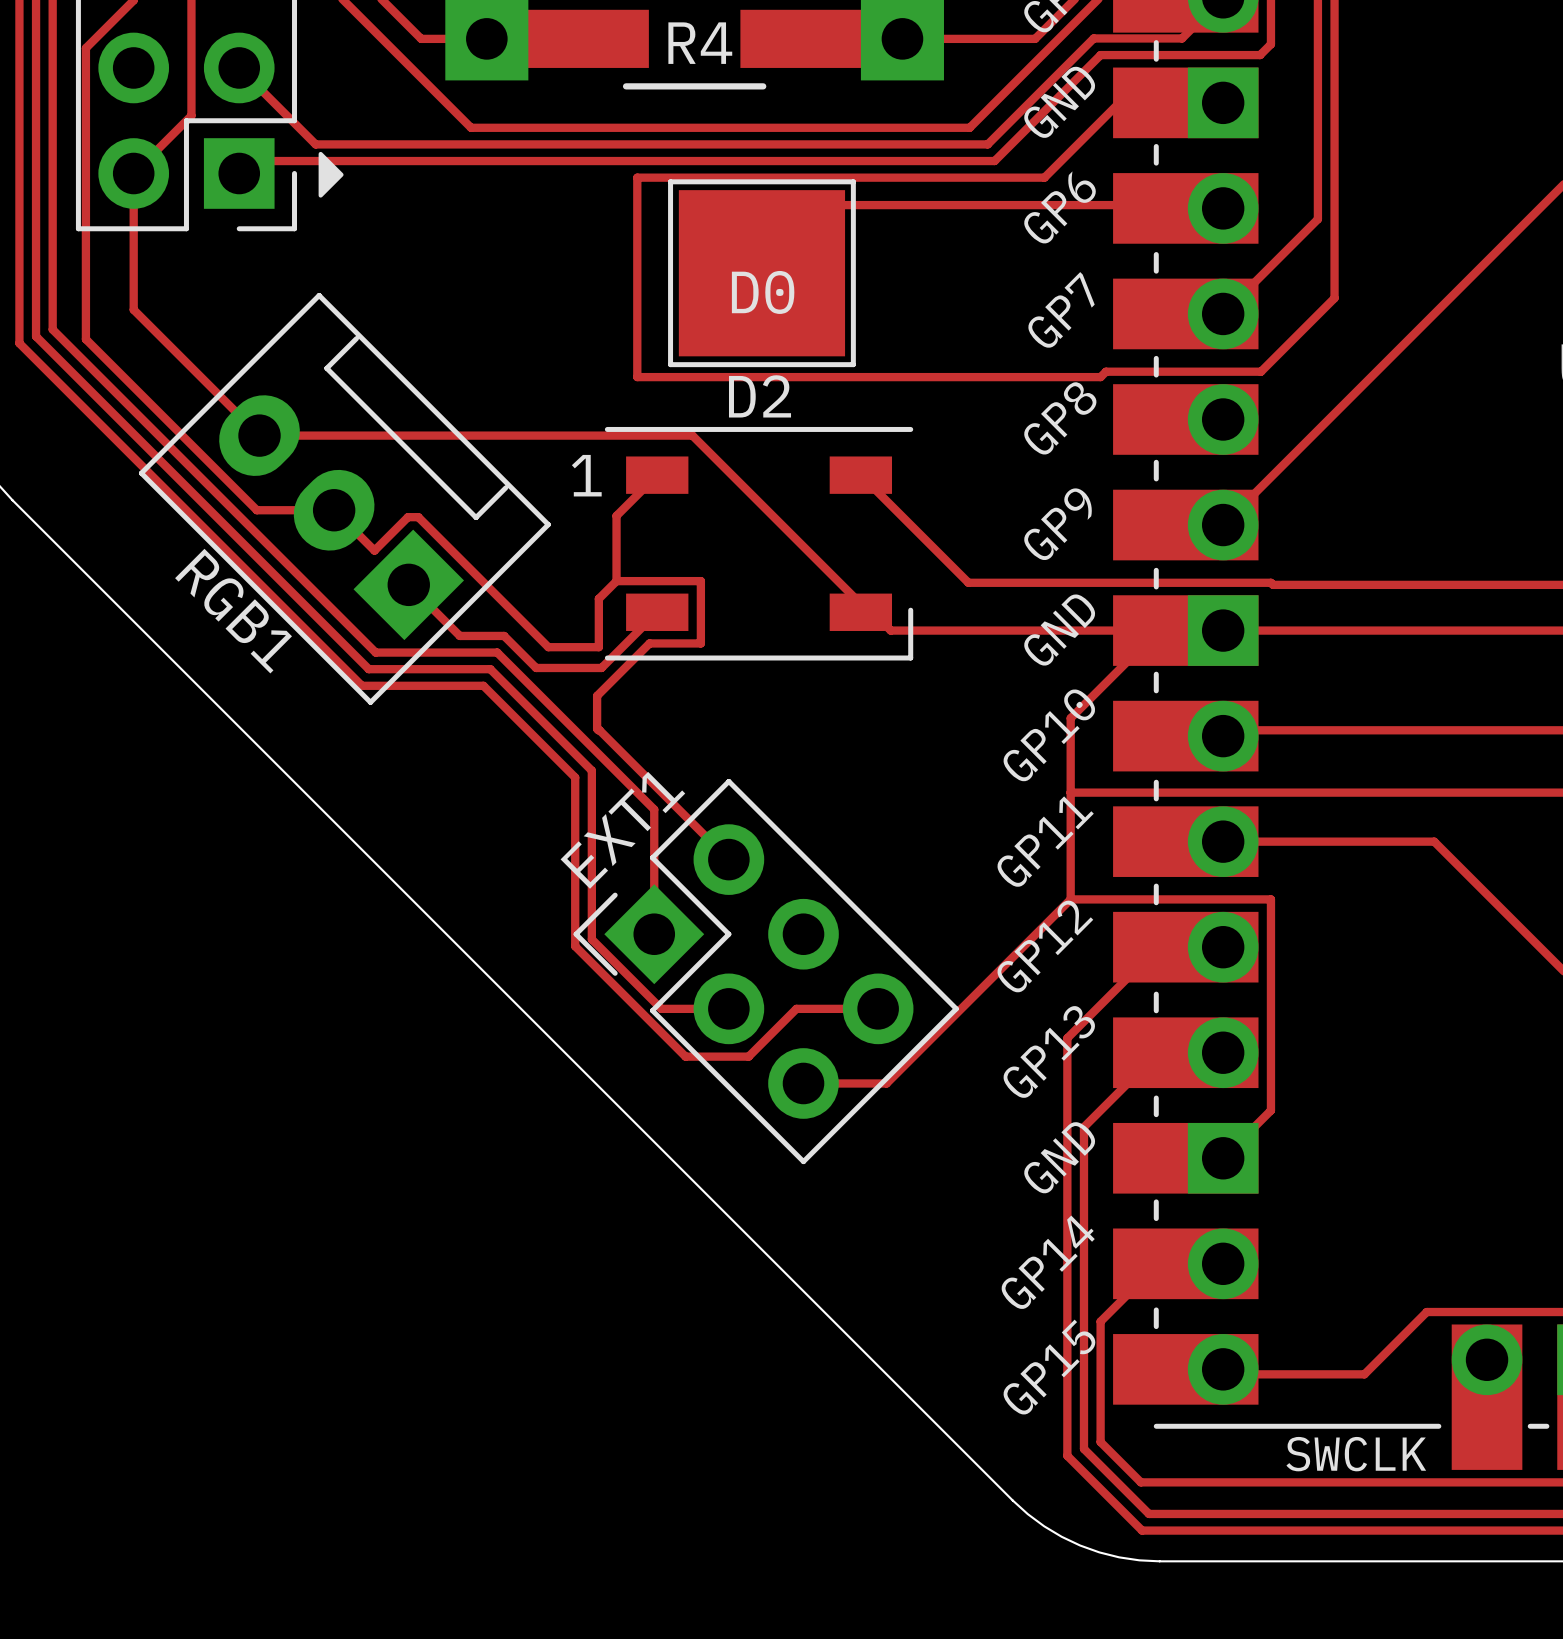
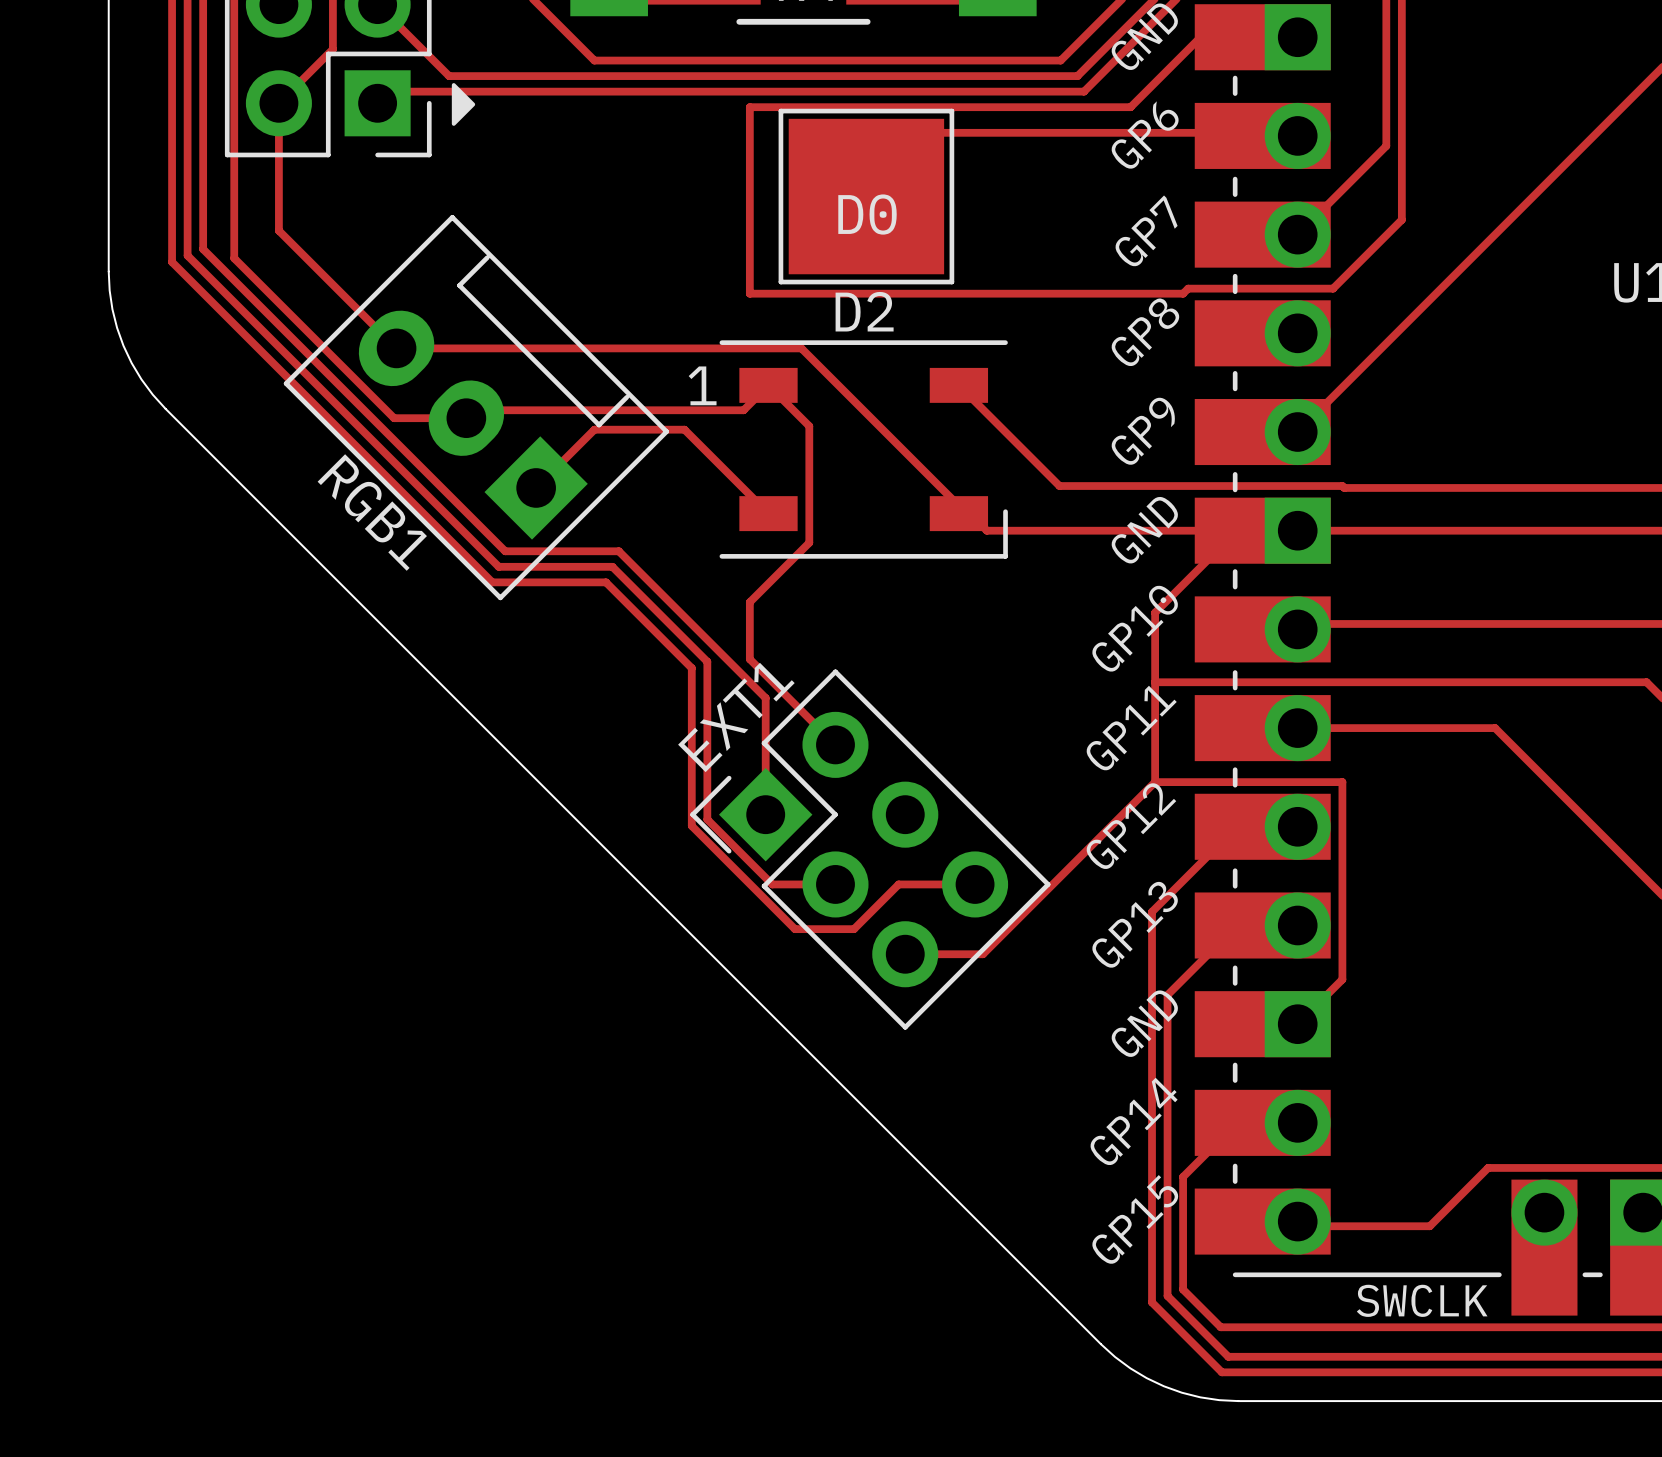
track: (630, 501) (616, 515) (616, 581) -> none
track: (334, 510) (374, 550) (408, 517) (418, 517) (548, 647) (598, 647) (598, 598) (616, 581) -> (466, 418) (485, 418) (493, 410) (743, 410)
track: (616, 581) (700, 581) -> (768, 385) (809, 426) (809, 484)
track: (408, 584) (459, 635) (504, 635) (536, 667) (601, 667) (657, 612) -> (536, 487) (594, 429) (684, 429) (768, 513)
track: (700, 643) (649, 643) (597, 695) (597, 728) (637, 768) -> (809, 542) (749, 602) (749, 659)

